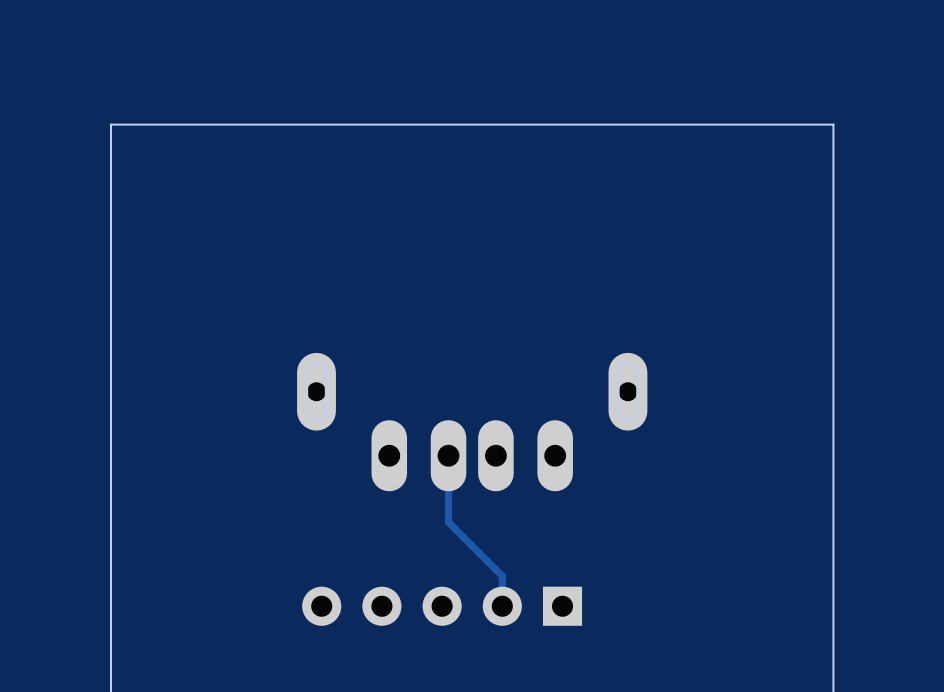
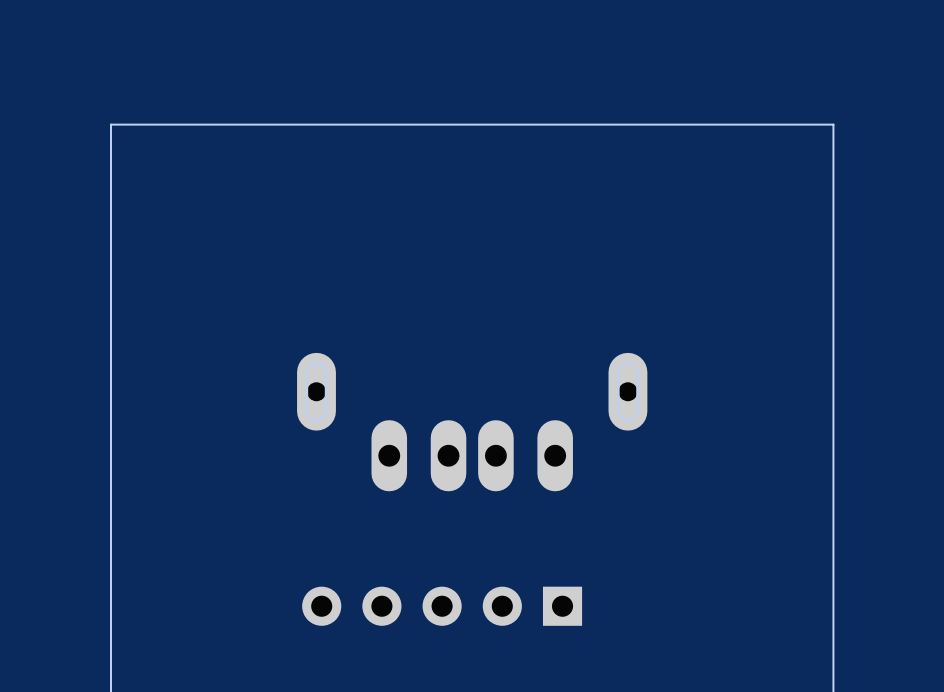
track: (448, 455) (448, 522) (502, 576) (502, 606) -> none

